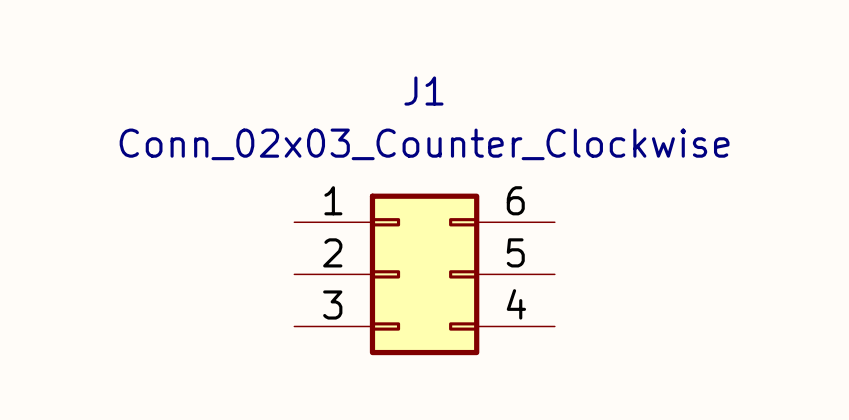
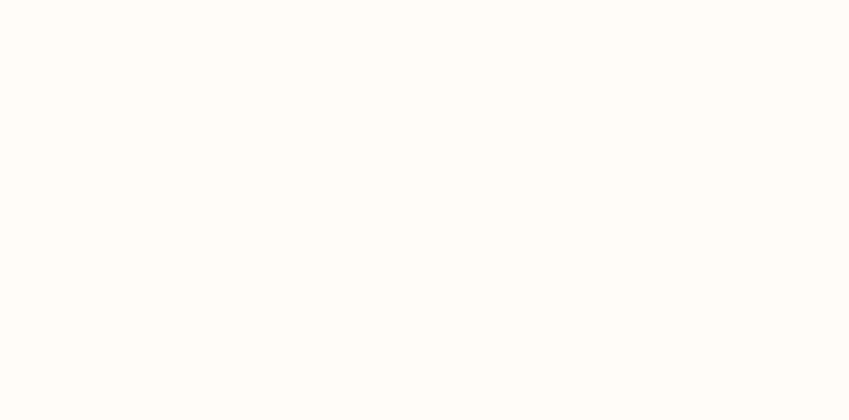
J1: Conn_02x03_Counter_Clockwise (424, 274) -> none

